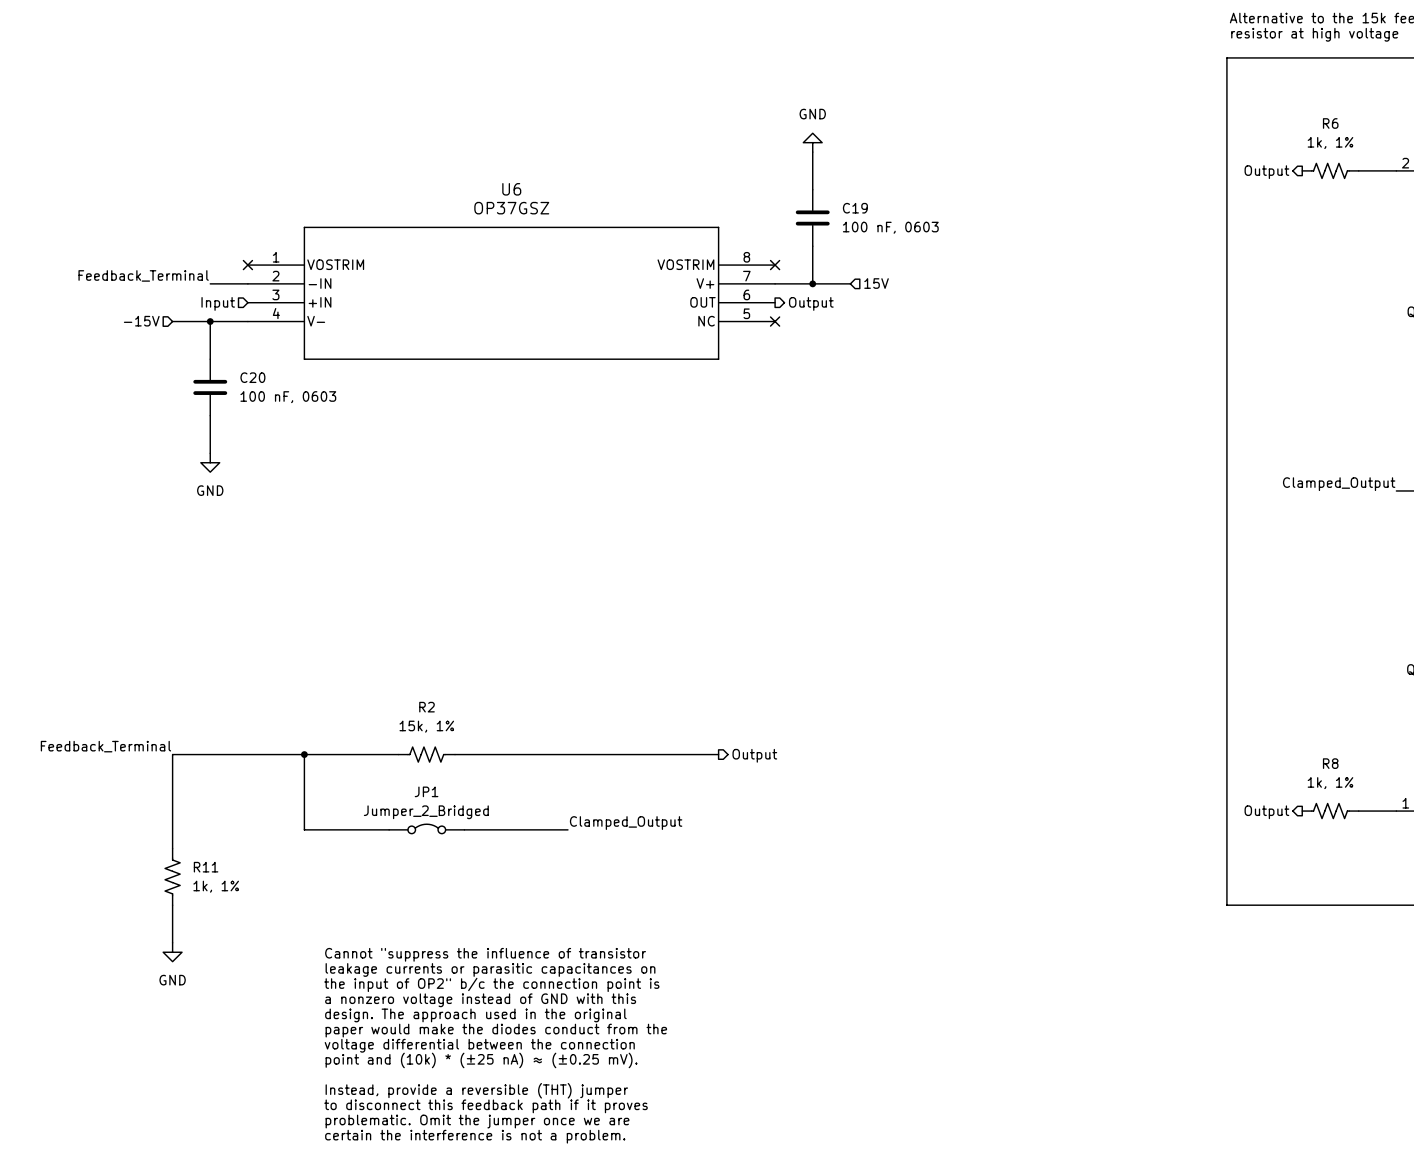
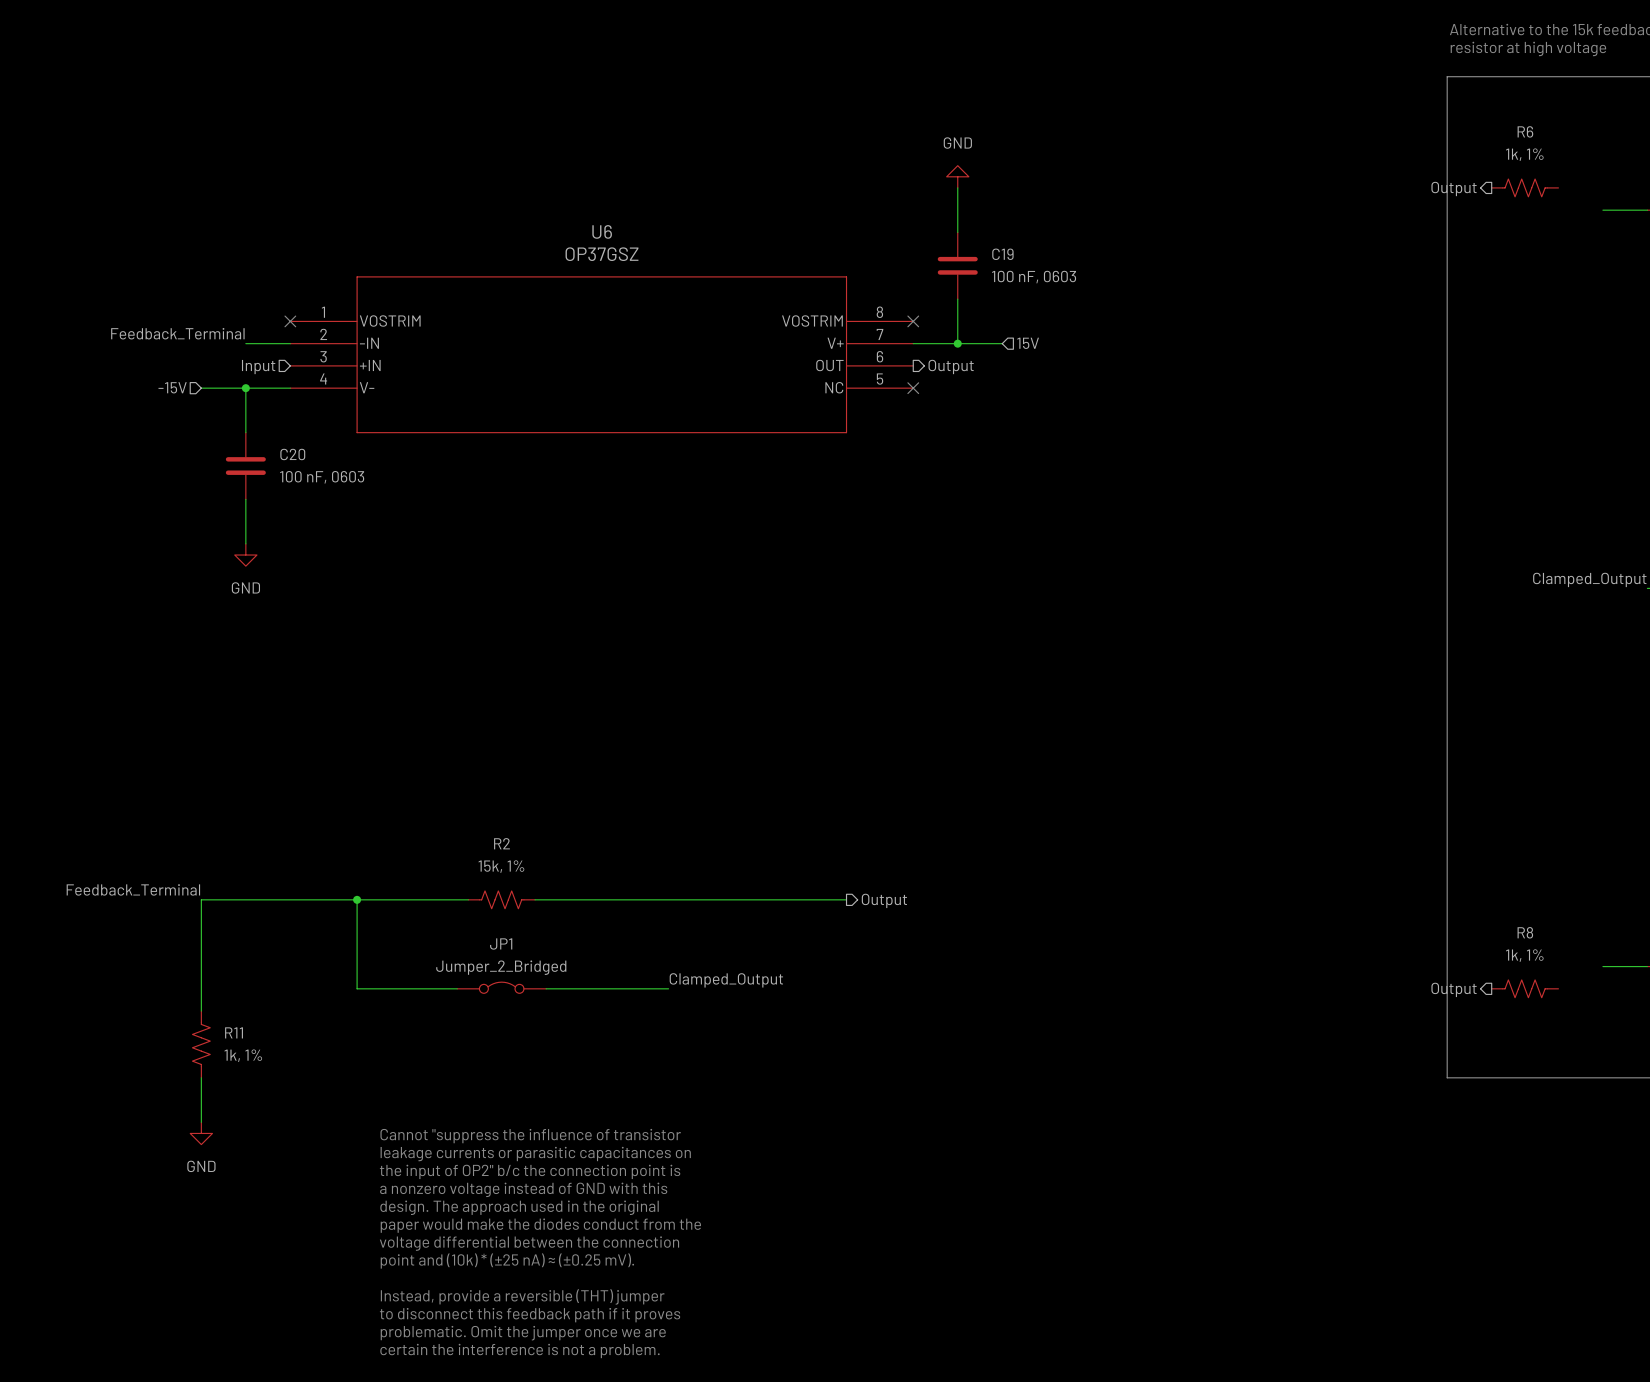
R6 position: (1330, 170) -> (1525, 187)
hierarchical label position: Output (1266, 172) -> Output (1454, 188)
R8 position: (1330, 811) -> (1525, 988)
hierarchical label position: Output (1266, 812) -> Output (1454, 989)

